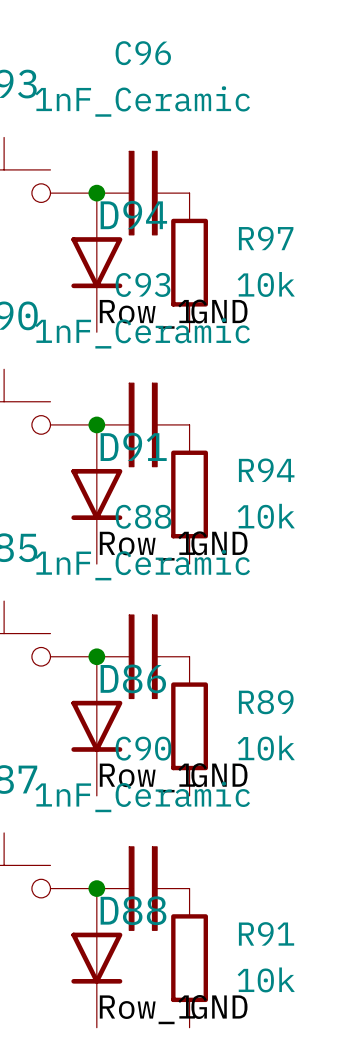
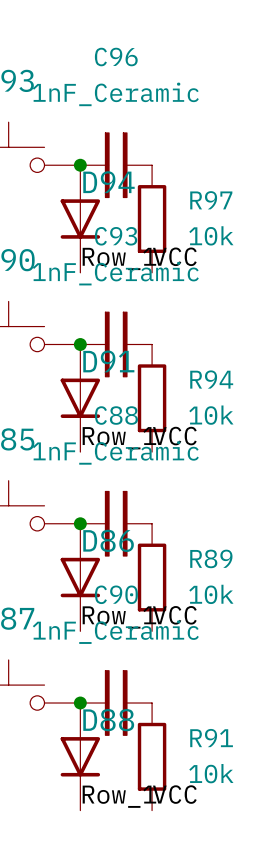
label: GND (219, 311) -> VCC (174, 256)
label: GND (219, 543) -> VCC (174, 436)
label: GND (219, 775) -> VCC (174, 615)
label: GND (219, 1006) -> VCC (174, 794)

